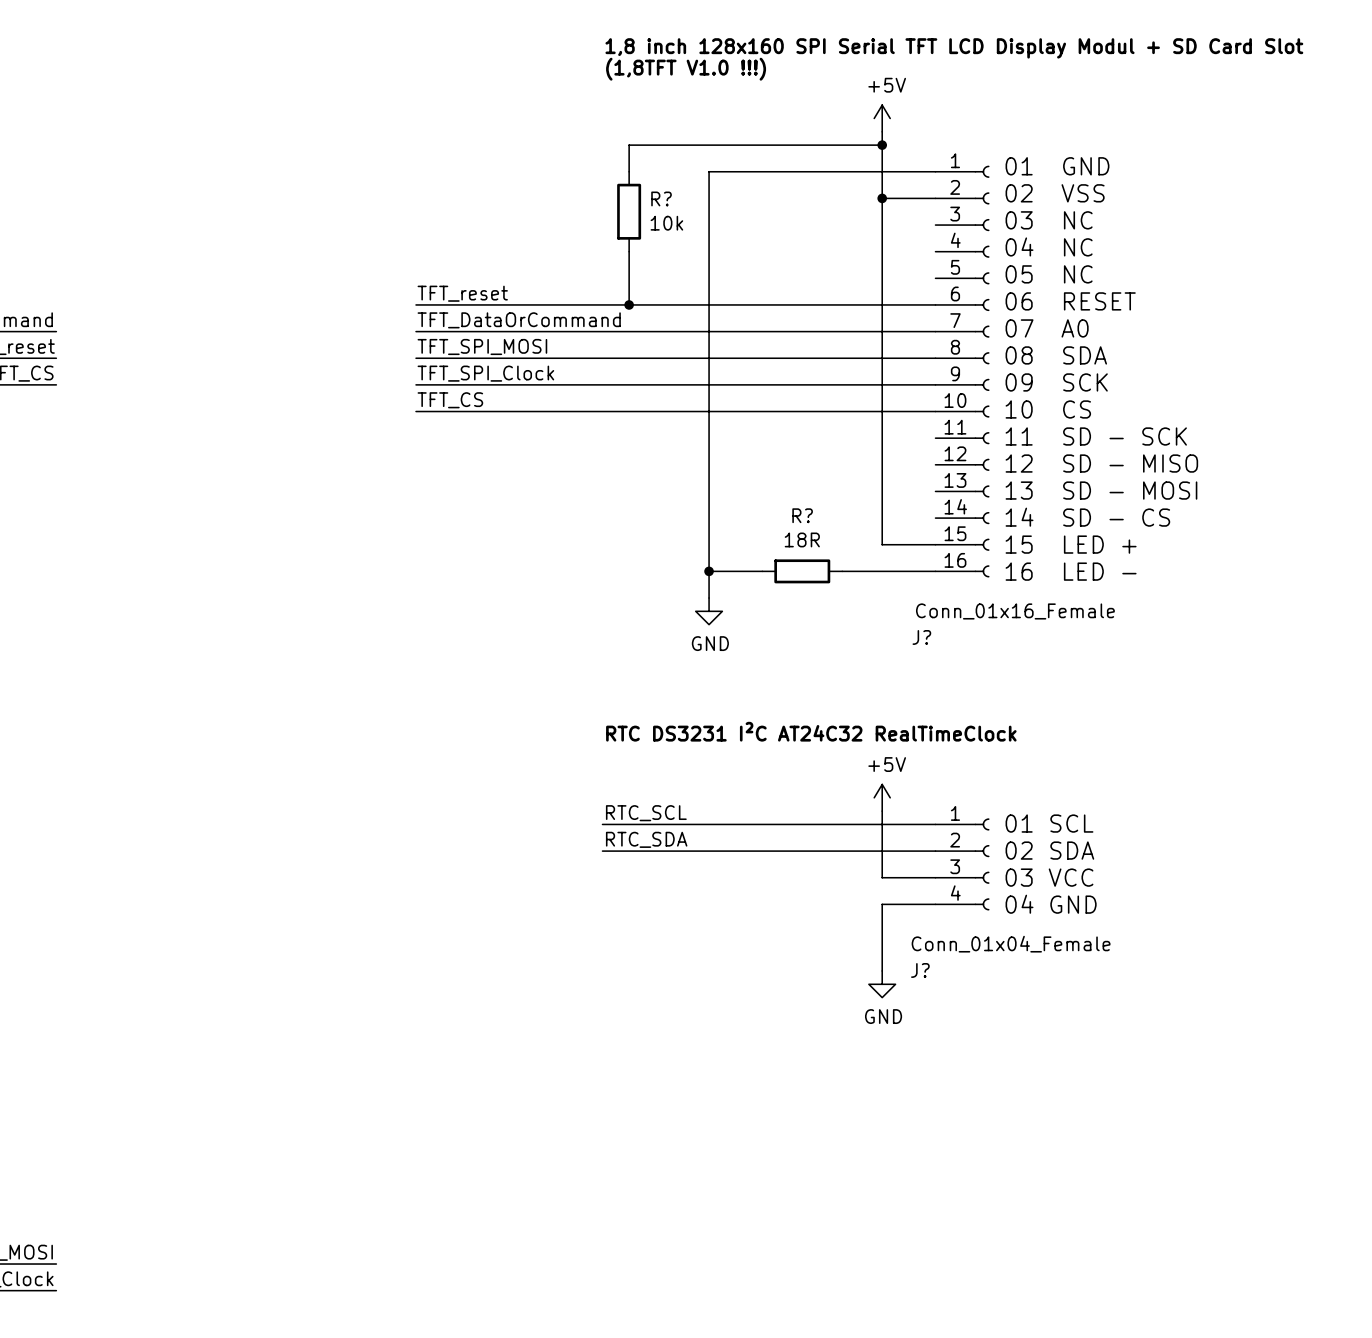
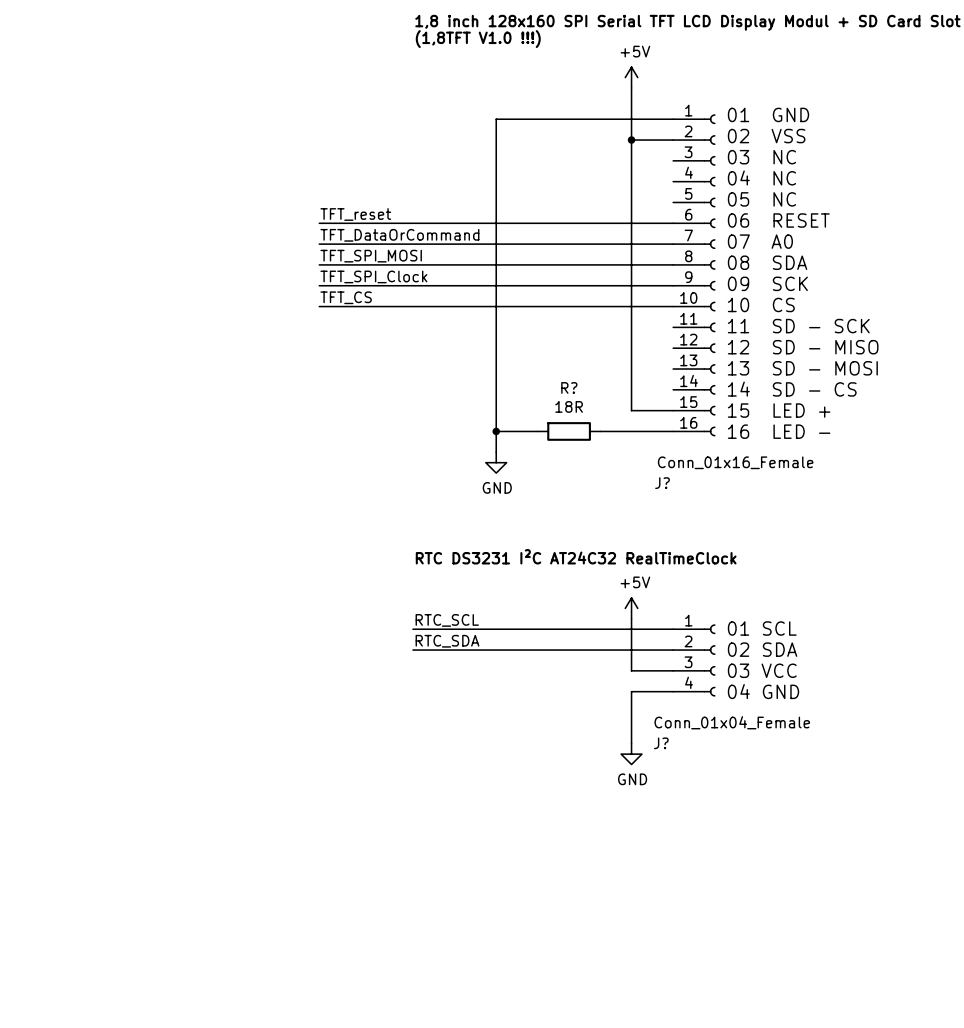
wire: (882, 145) (629, 145) (629, 171) -> none
junction: (882, 145) -> none
R?: 10k (629, 211) -> none
wire: (629, 251) (629, 304) -> none
label position: TFT_reset (462, 293) -> TFT_reset (355, 214)
wire: (416, 304) (482, 304) -> none
junction: (629, 304) -> none
label position: TFT_DataOrCommand (519, 320) -> TFT_DataOrCommand (399, 235)
wire: (416, 331) (482, 331) -> none
label position: TFT_SPI_MOSI (482, 346) -> TFT_SPI_MOSI (371, 256)
wire: (416, 358) (482, 358) -> none
label position: TFT_SPI_Clock (485, 373) -> TFT_SPI_Clock (373, 276)
wire: (416, 384) (482, 384) -> none
label position: TFT_CS (450, 400) -> TFT_CS (346, 297)
wire: (416, 411) (482, 411) -> none

